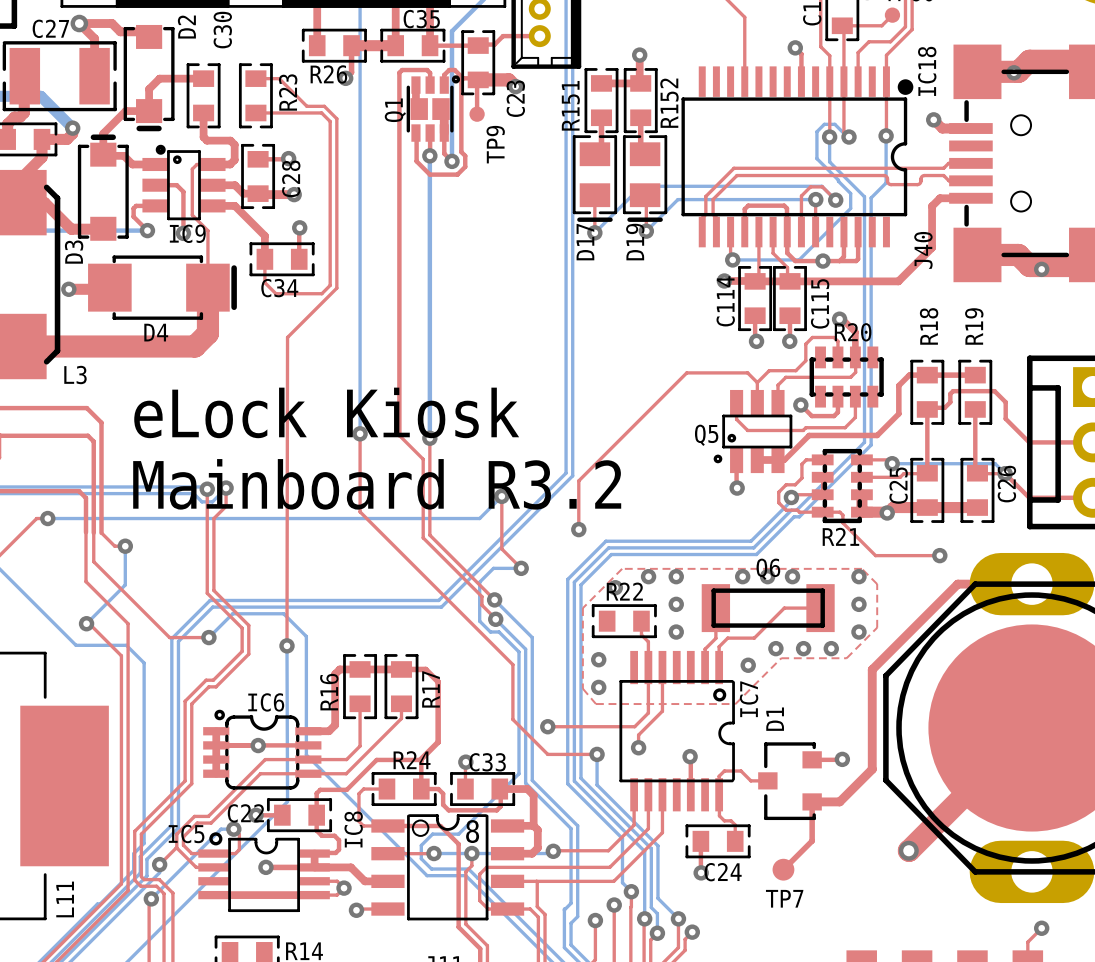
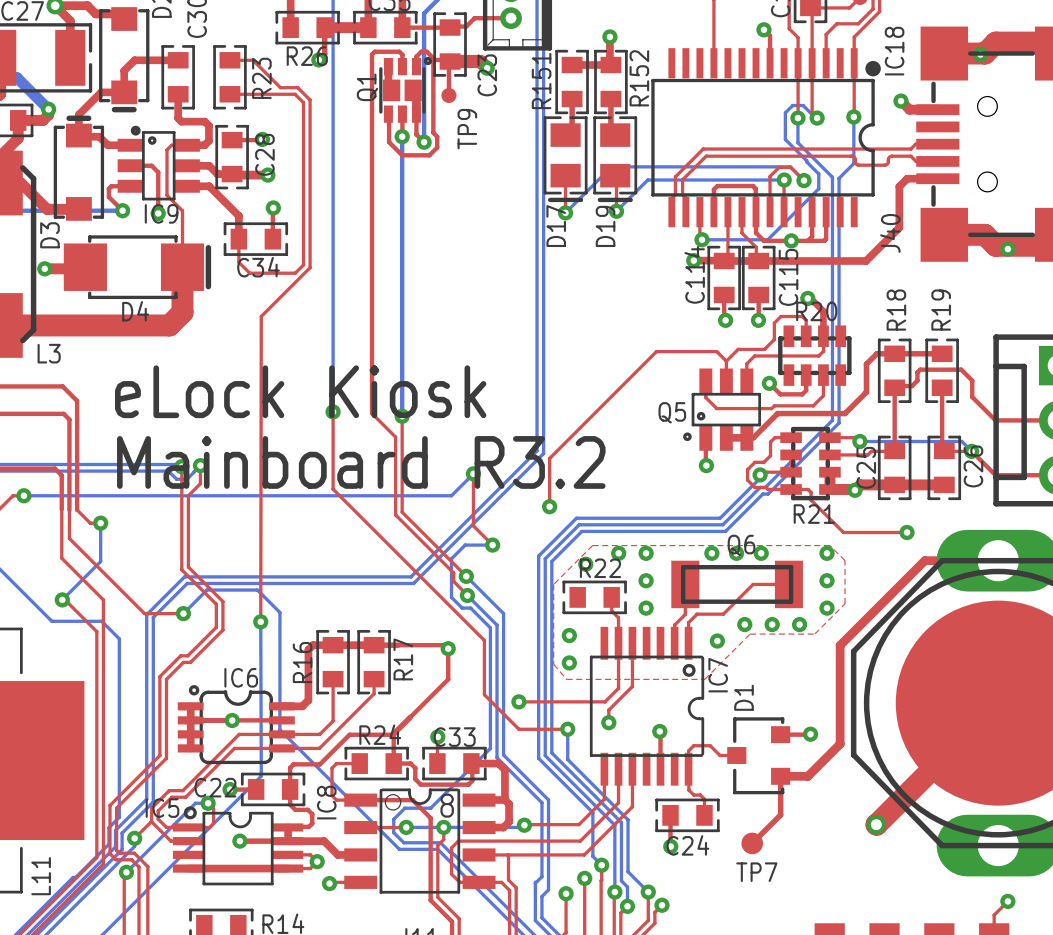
top track: (425, 669) (438, 681) (438, 742) -> (398, 645) (444, 645) (448, 648) (448, 679) (410, 717)
via: none -> (448, 648)

